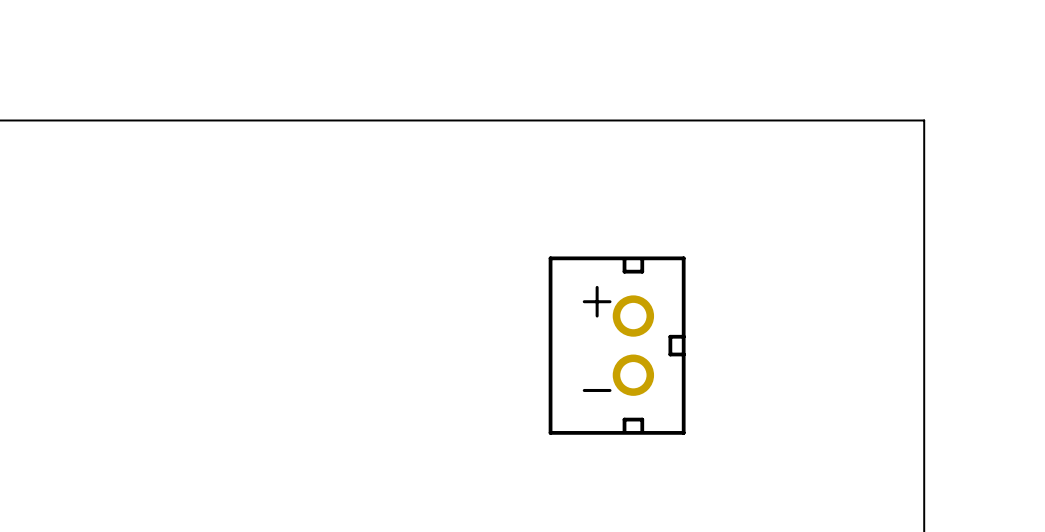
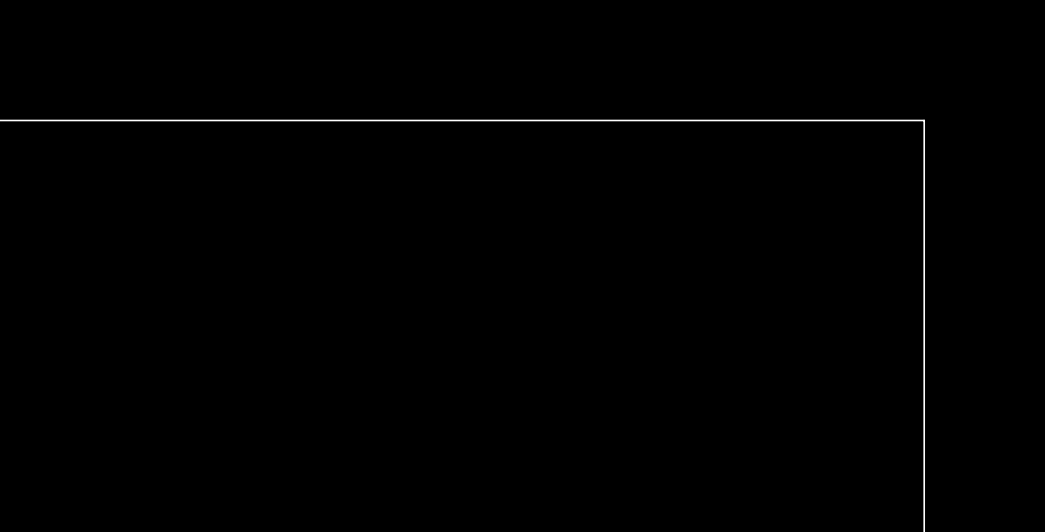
part: (617, 345) -> none

